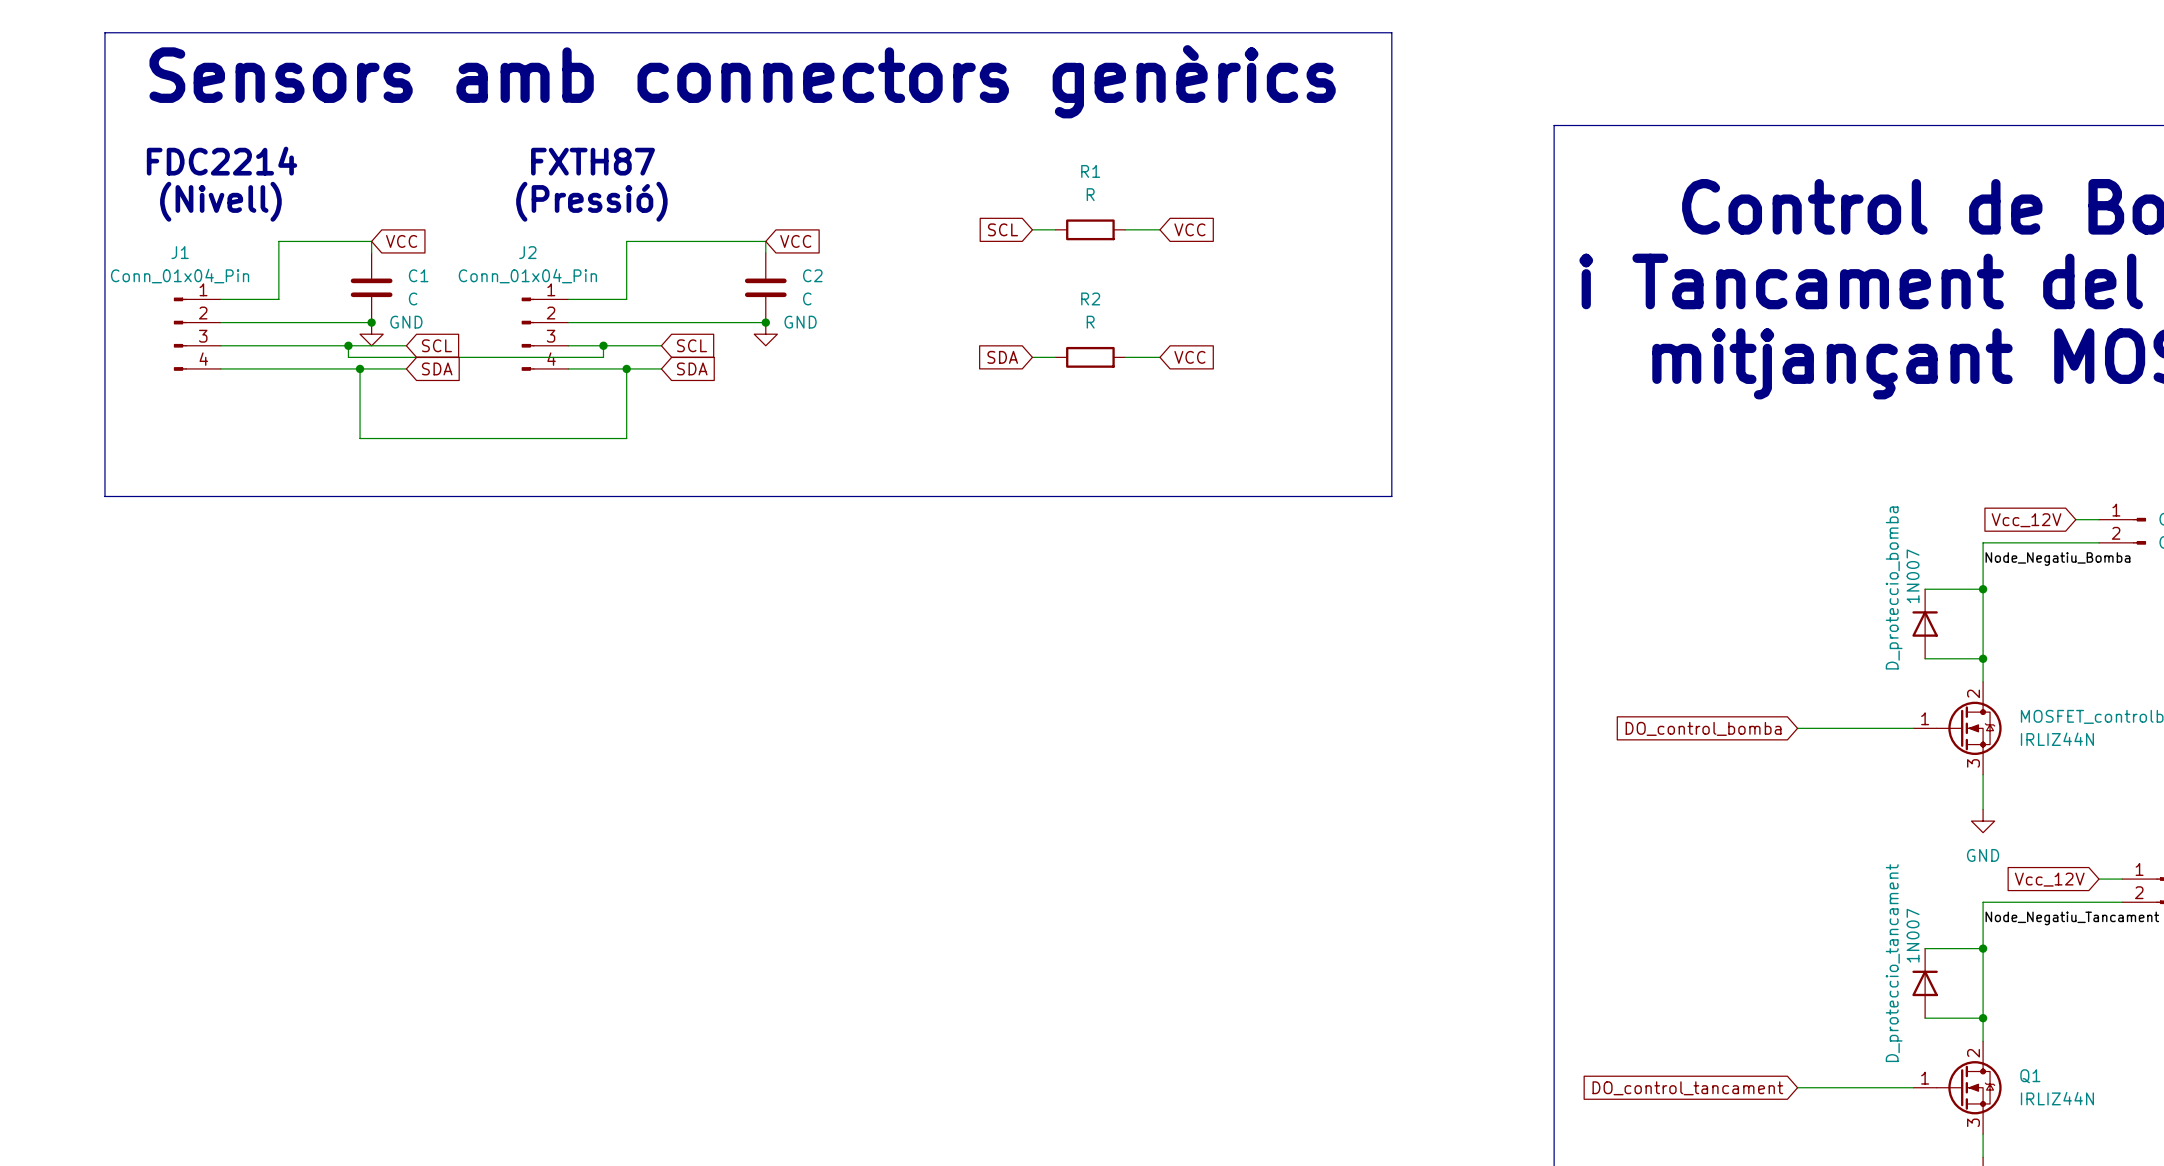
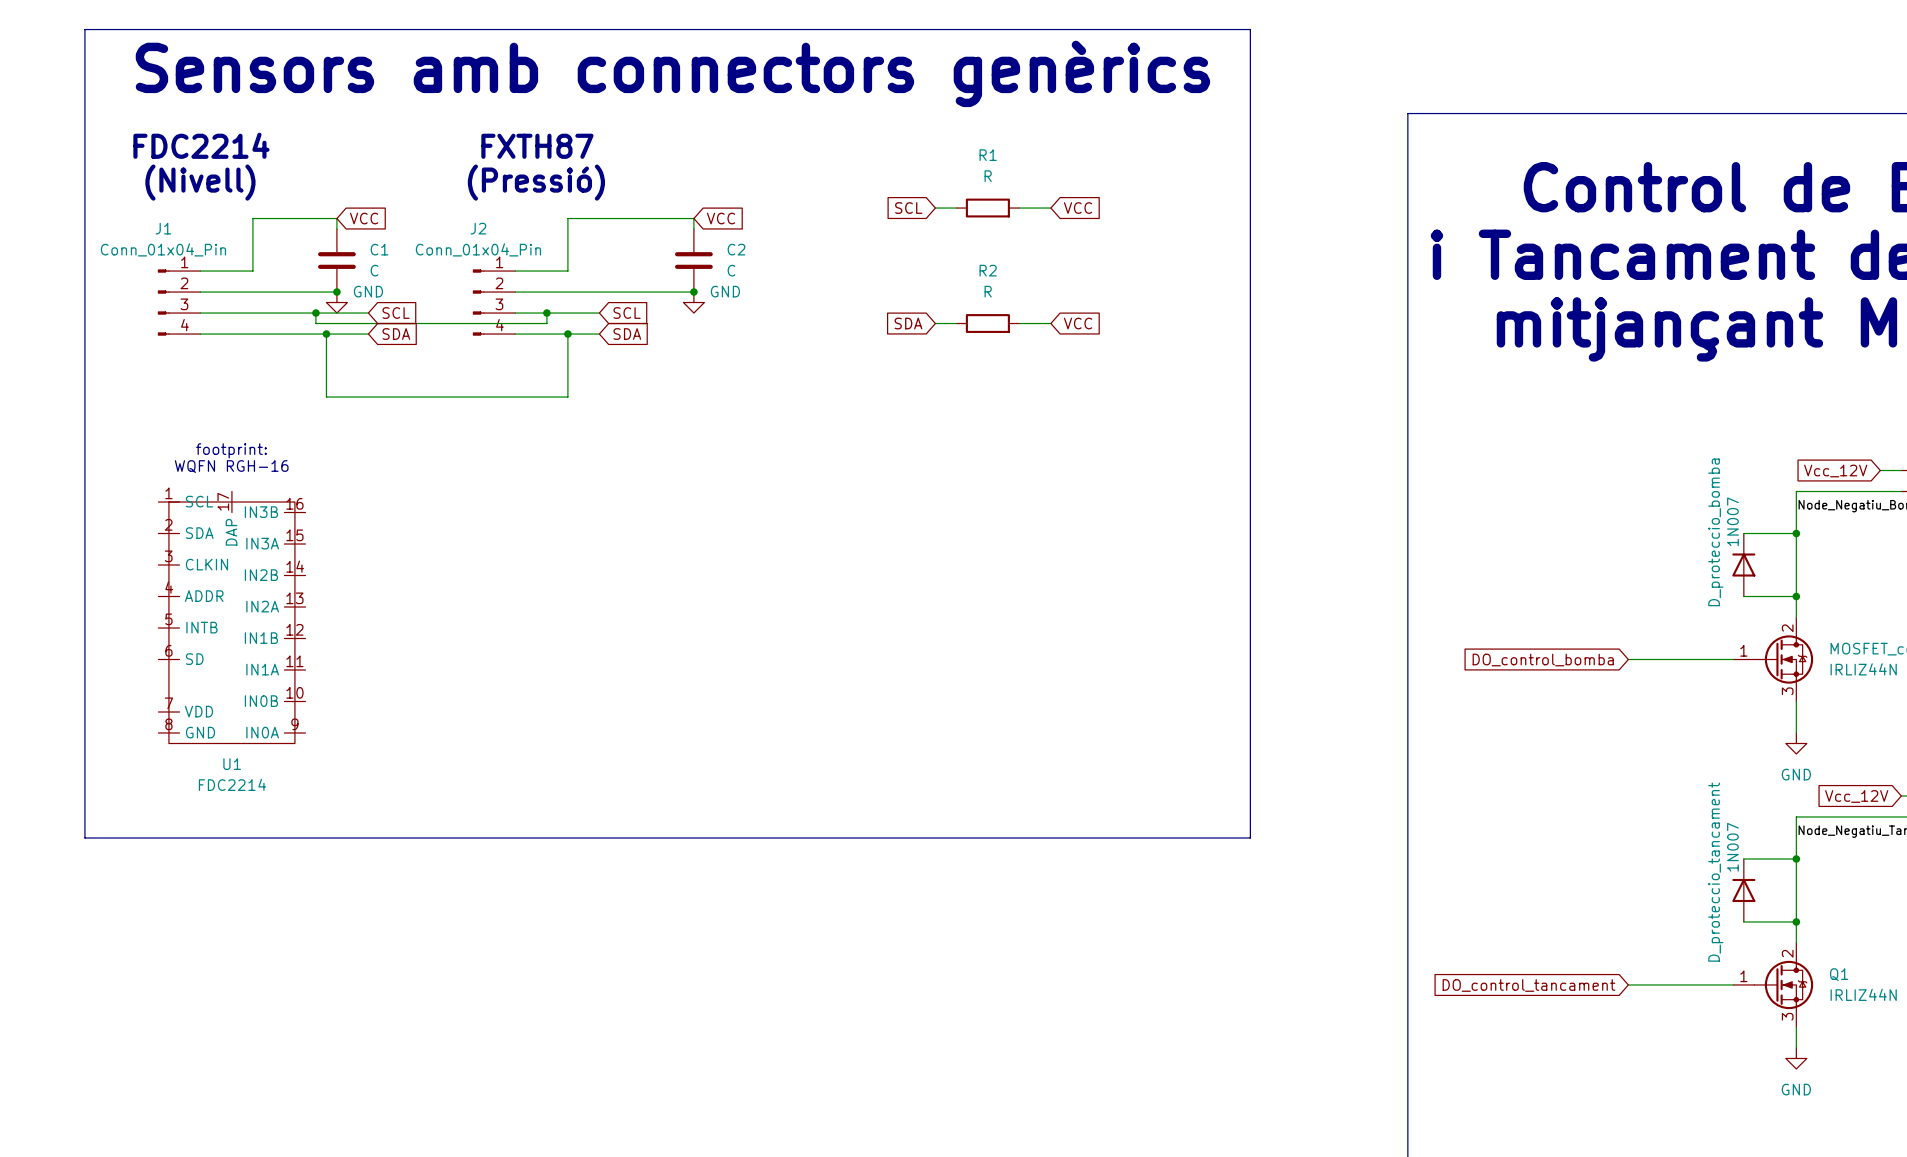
bus: (104, 32) (104, 496) (1391, 496) (1391, 32) (1380, 32) -> (95, 29) (84, 29) (84, 837) (1250, 837) (1250, 29)
text: none -> footprint: (231, 450)
text: none -> WQFN RGH-16 (231, 466)
U1: none -> FDC2214 (231, 617)

